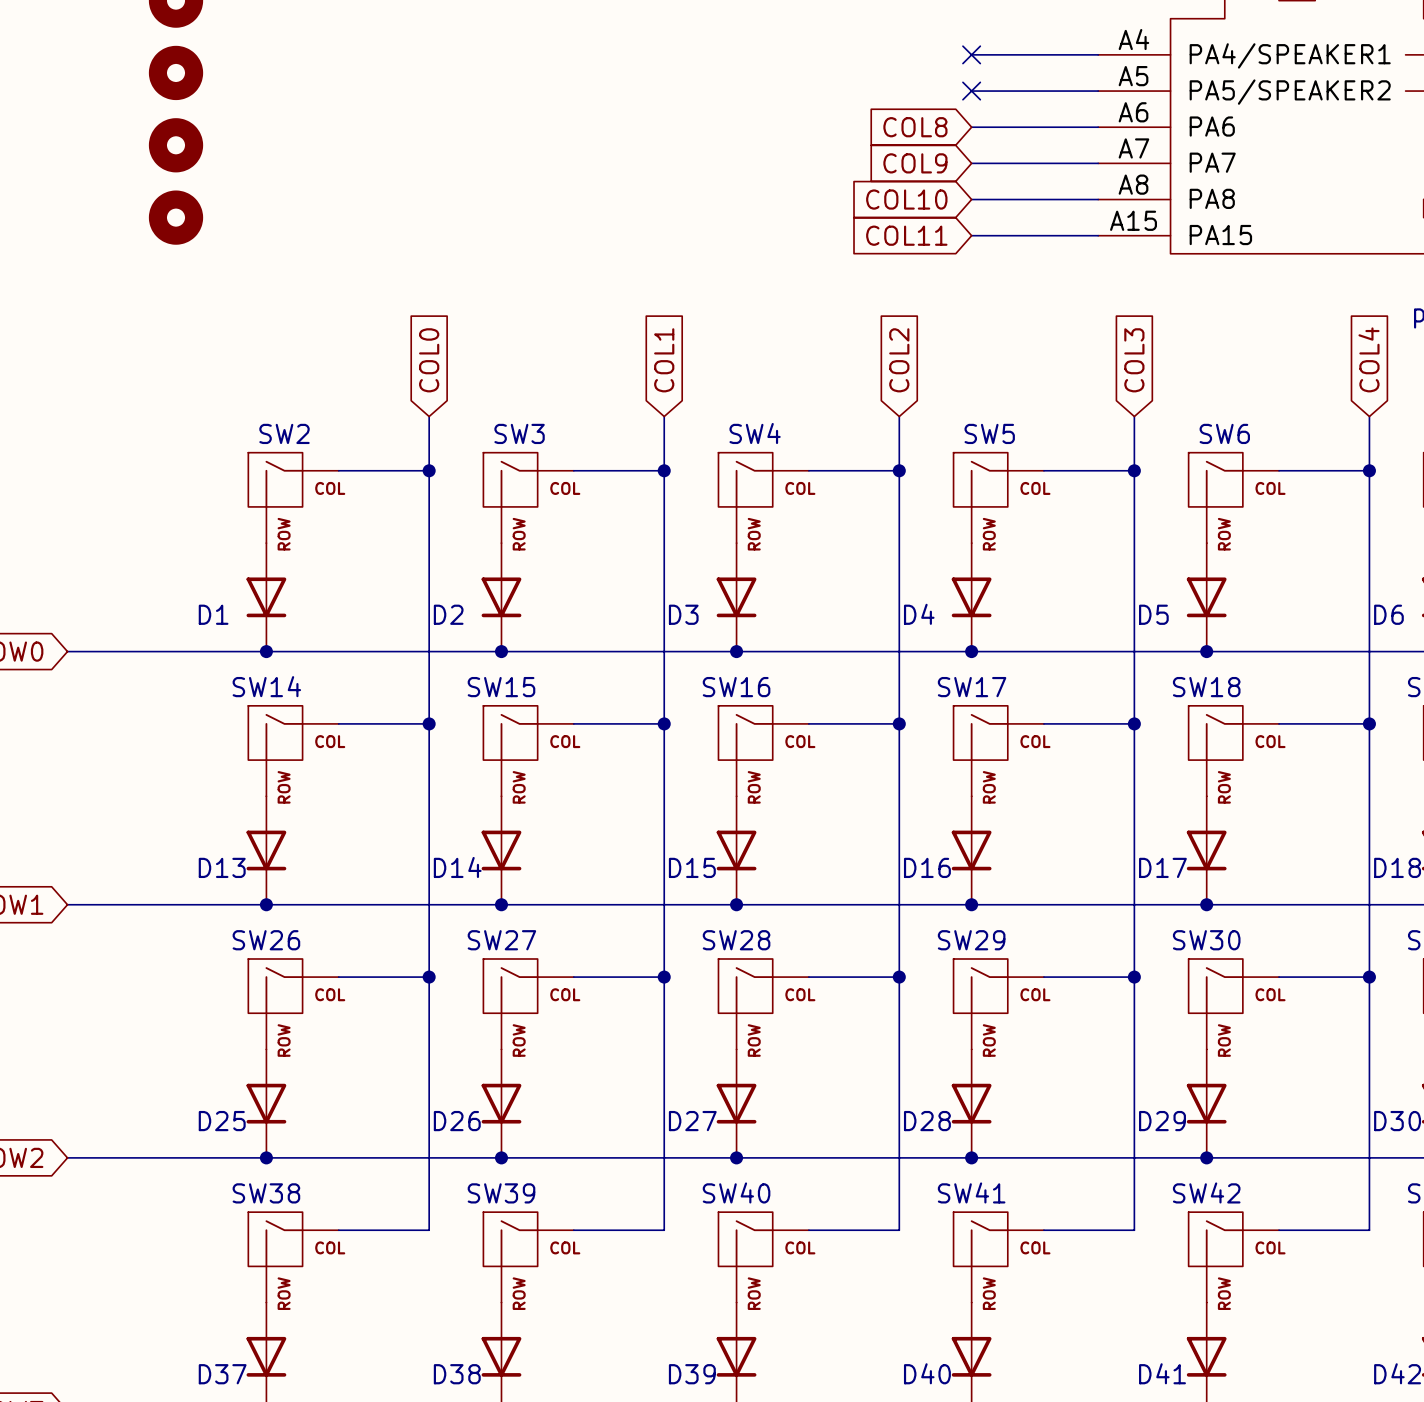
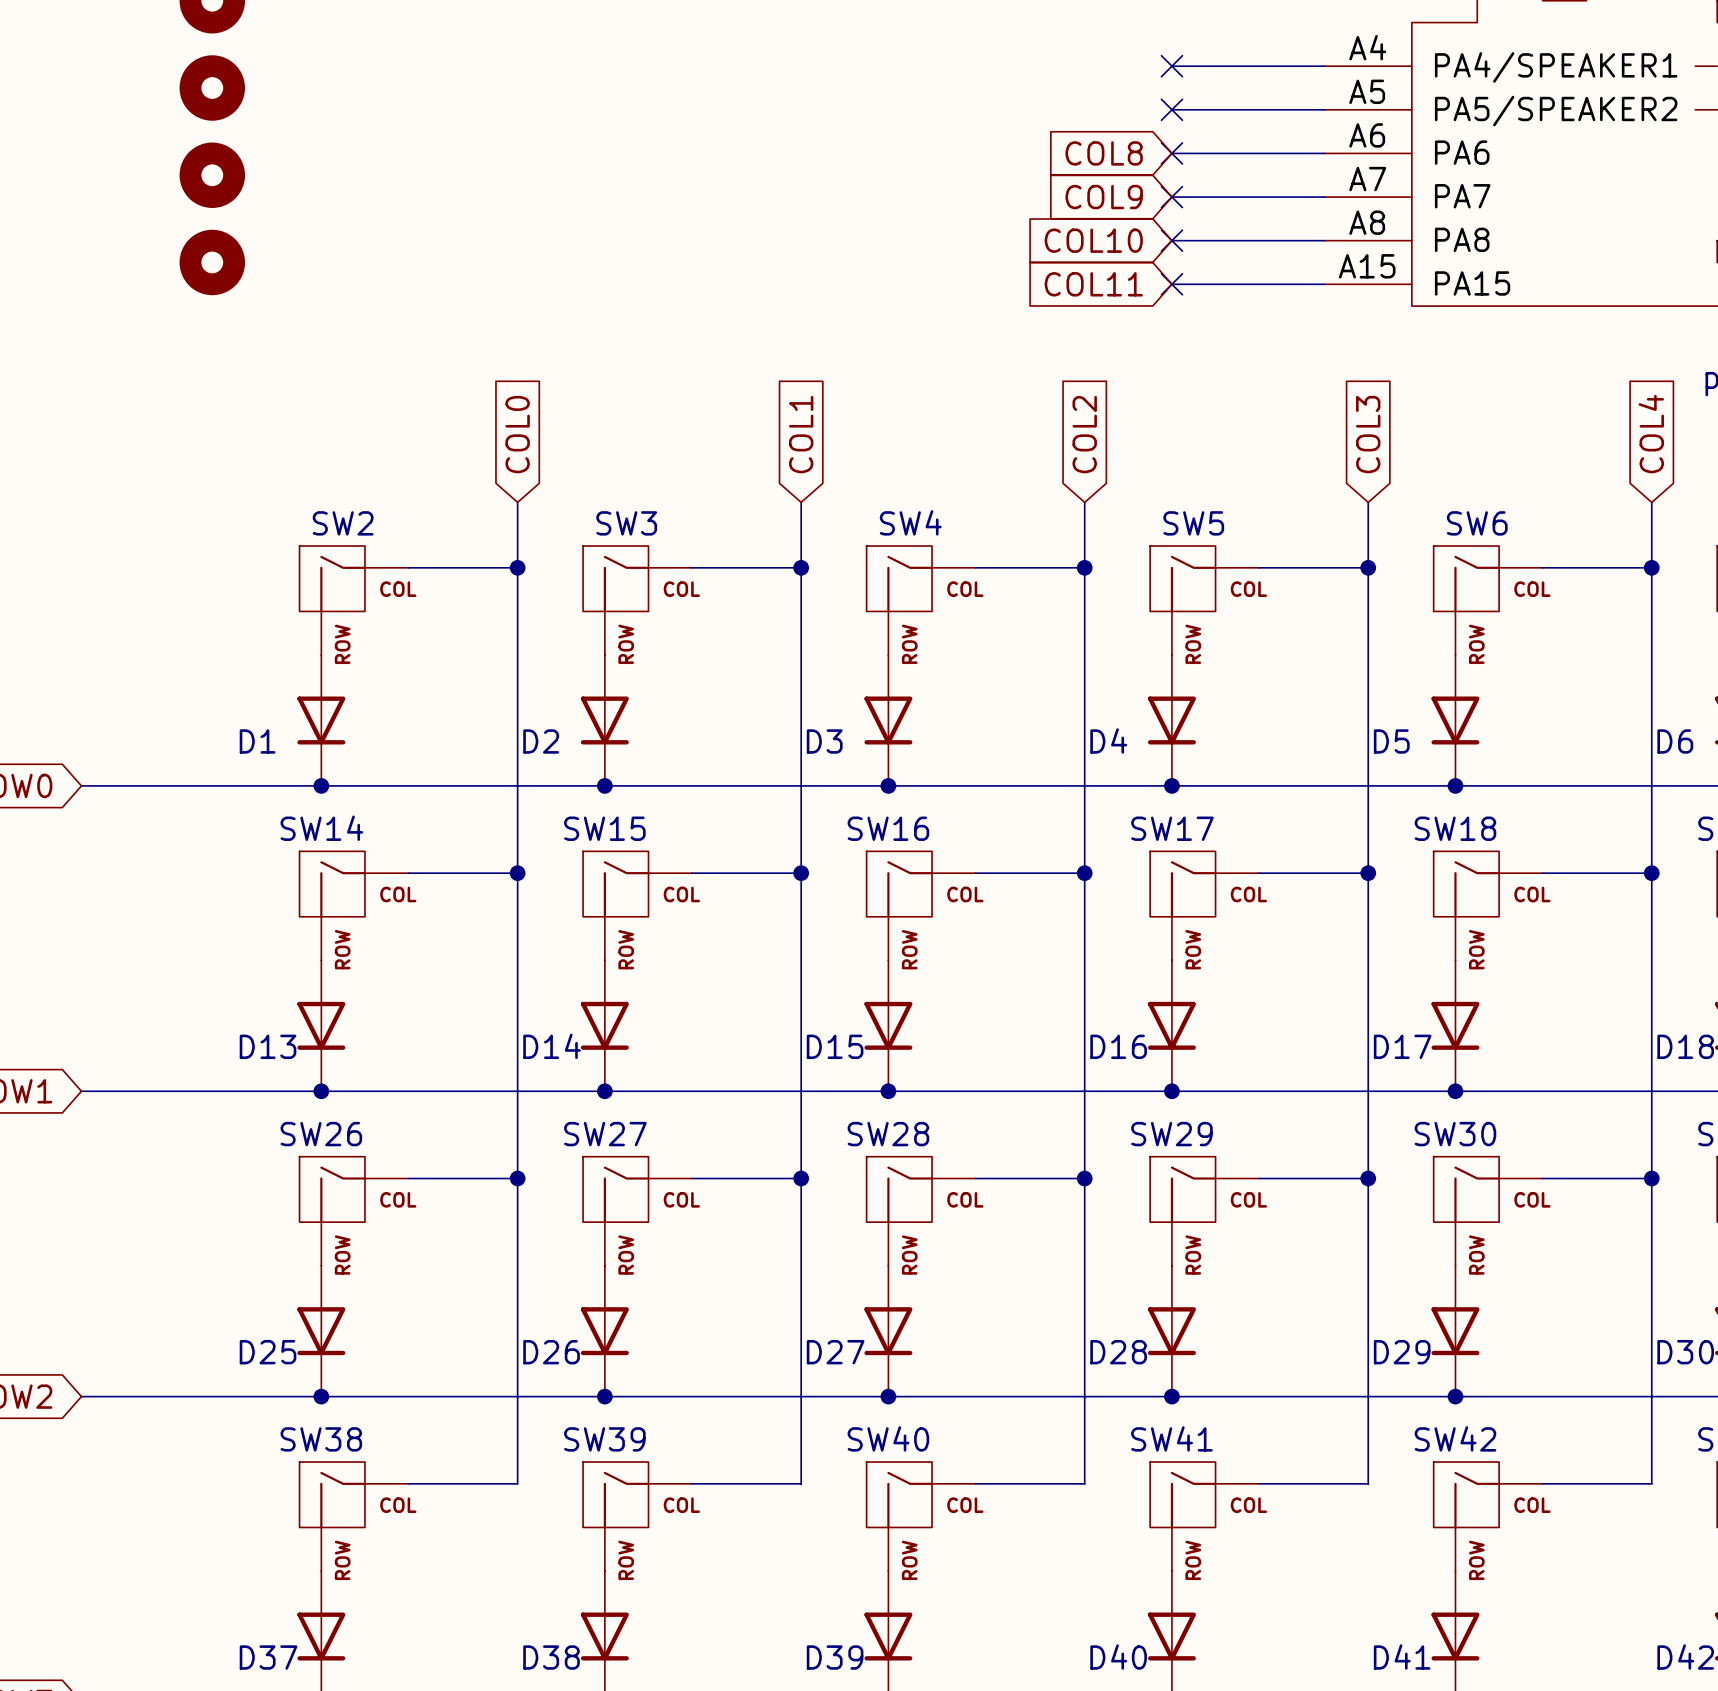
no-connect mark: none -> (1171, 153)
no-connect mark: none -> (1171, 197)
no-connect mark: none -> (1171, 240)
no-connect mark: none -> (1171, 284)

